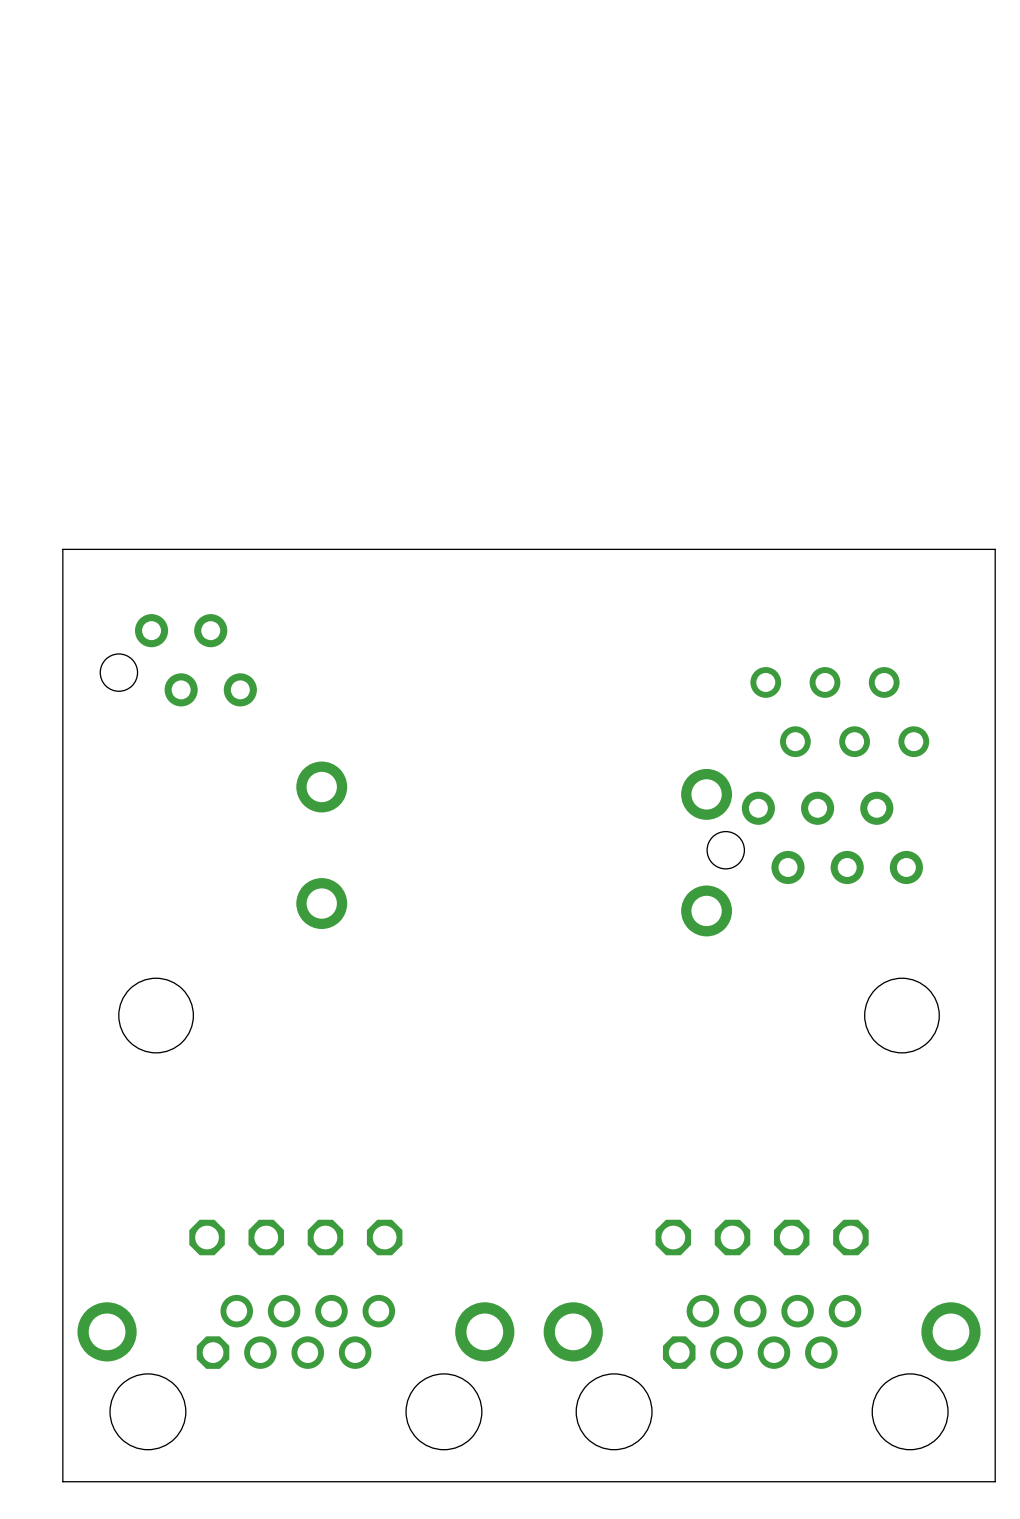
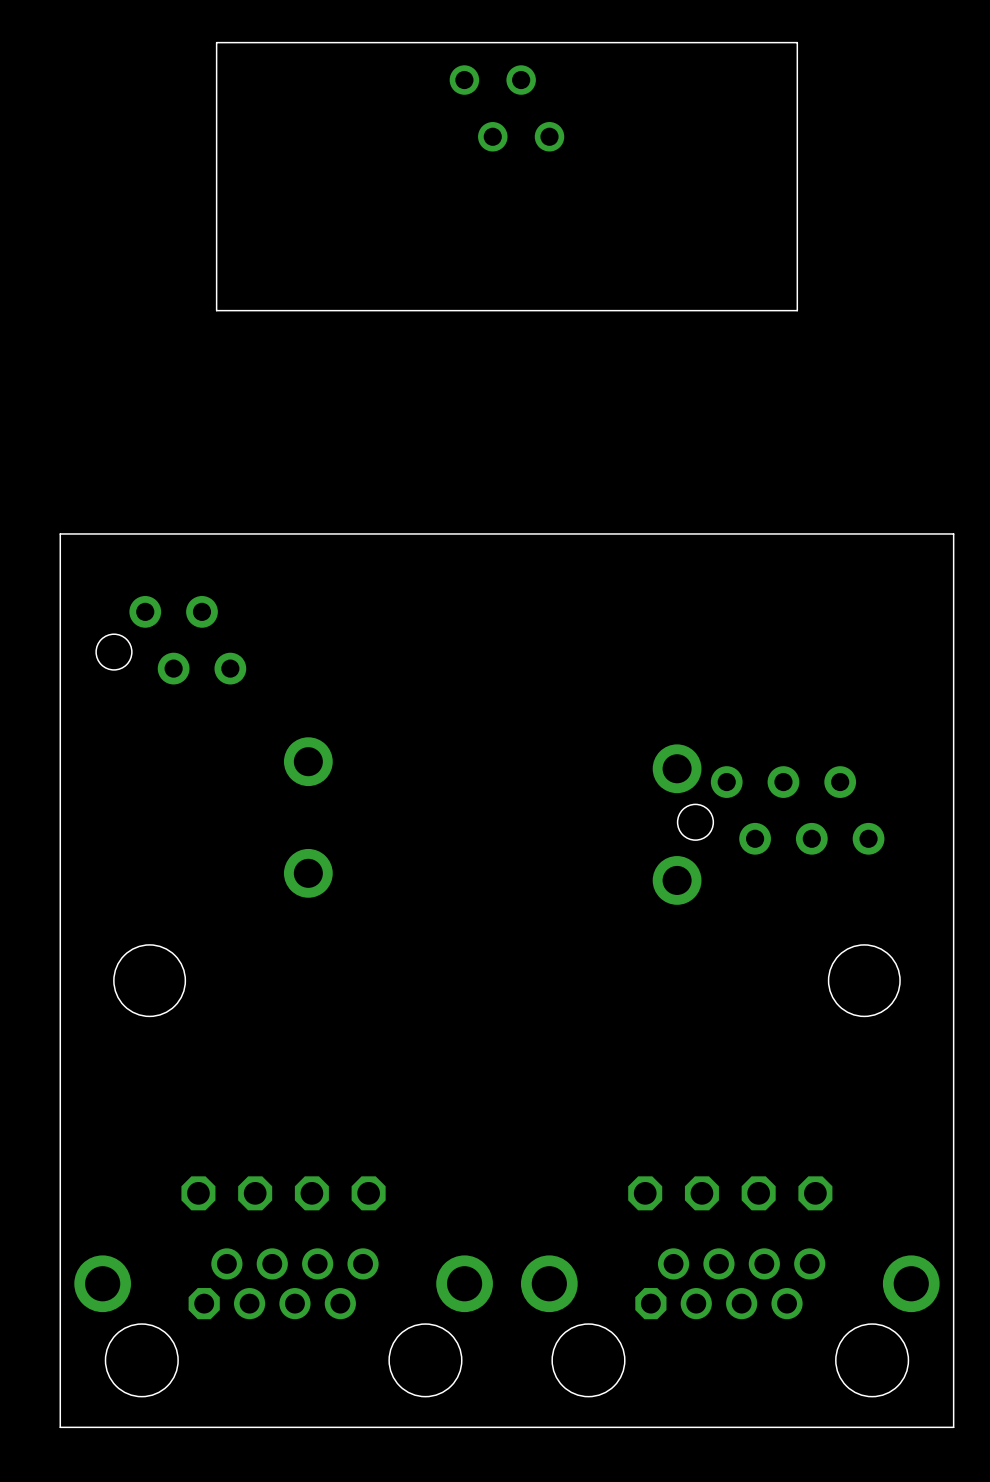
board edge: none -> (797, 42) (216, 42) (216, 310) (797, 310) (797, 42)
part: none -> (506, 108)
part: (839, 712) -> none

